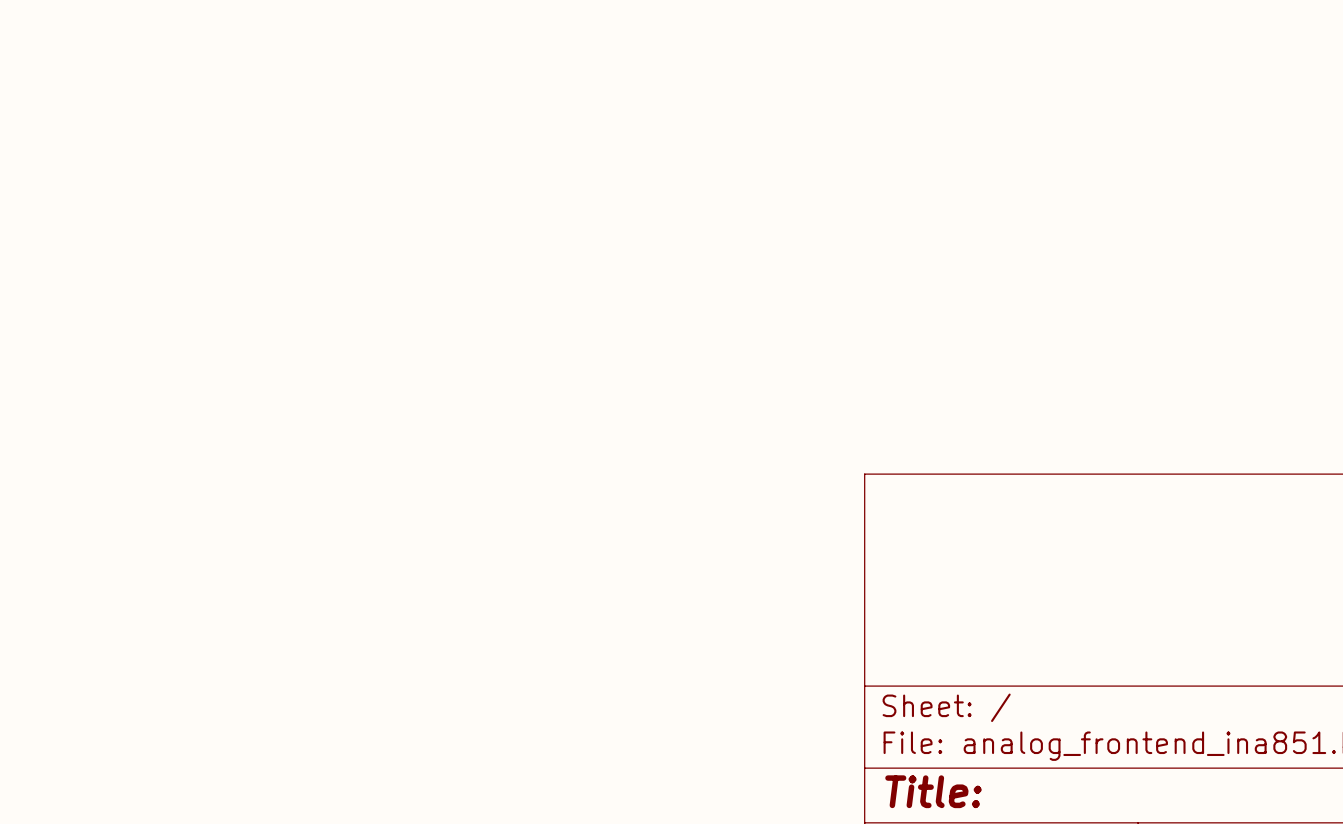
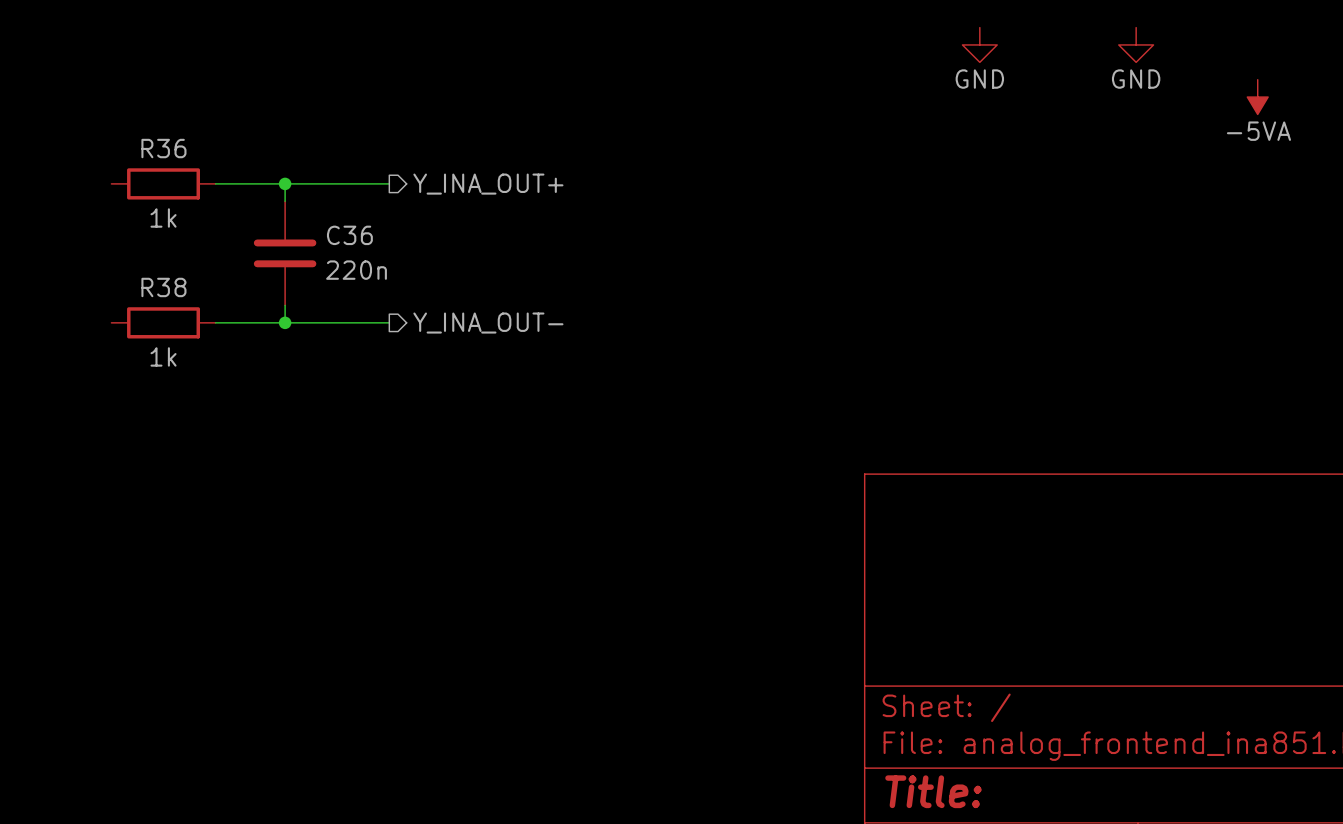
power symbol: none -> GND (979, 44)
power symbol: none -> GND (1136, 44)
power symbol: none -> -5VA (1257, 97)
R36: none -> 1k (163, 183)
wire: none -> (215, 183) (389, 183)
wire: none -> (285, 183) (285, 201)
junction: none -> (285, 183)
hierarchical label: none -> Y_INA_OUT+ (488, 184)
C36: none -> 220n (285, 253)
wire: none -> (285, 305) (285, 322)
R38: none -> 1k (163, 322)
wire: none -> (215, 322) (389, 322)
junction: none -> (285, 322)
hierarchical label: none -> Y_INA_OUT- (488, 323)

